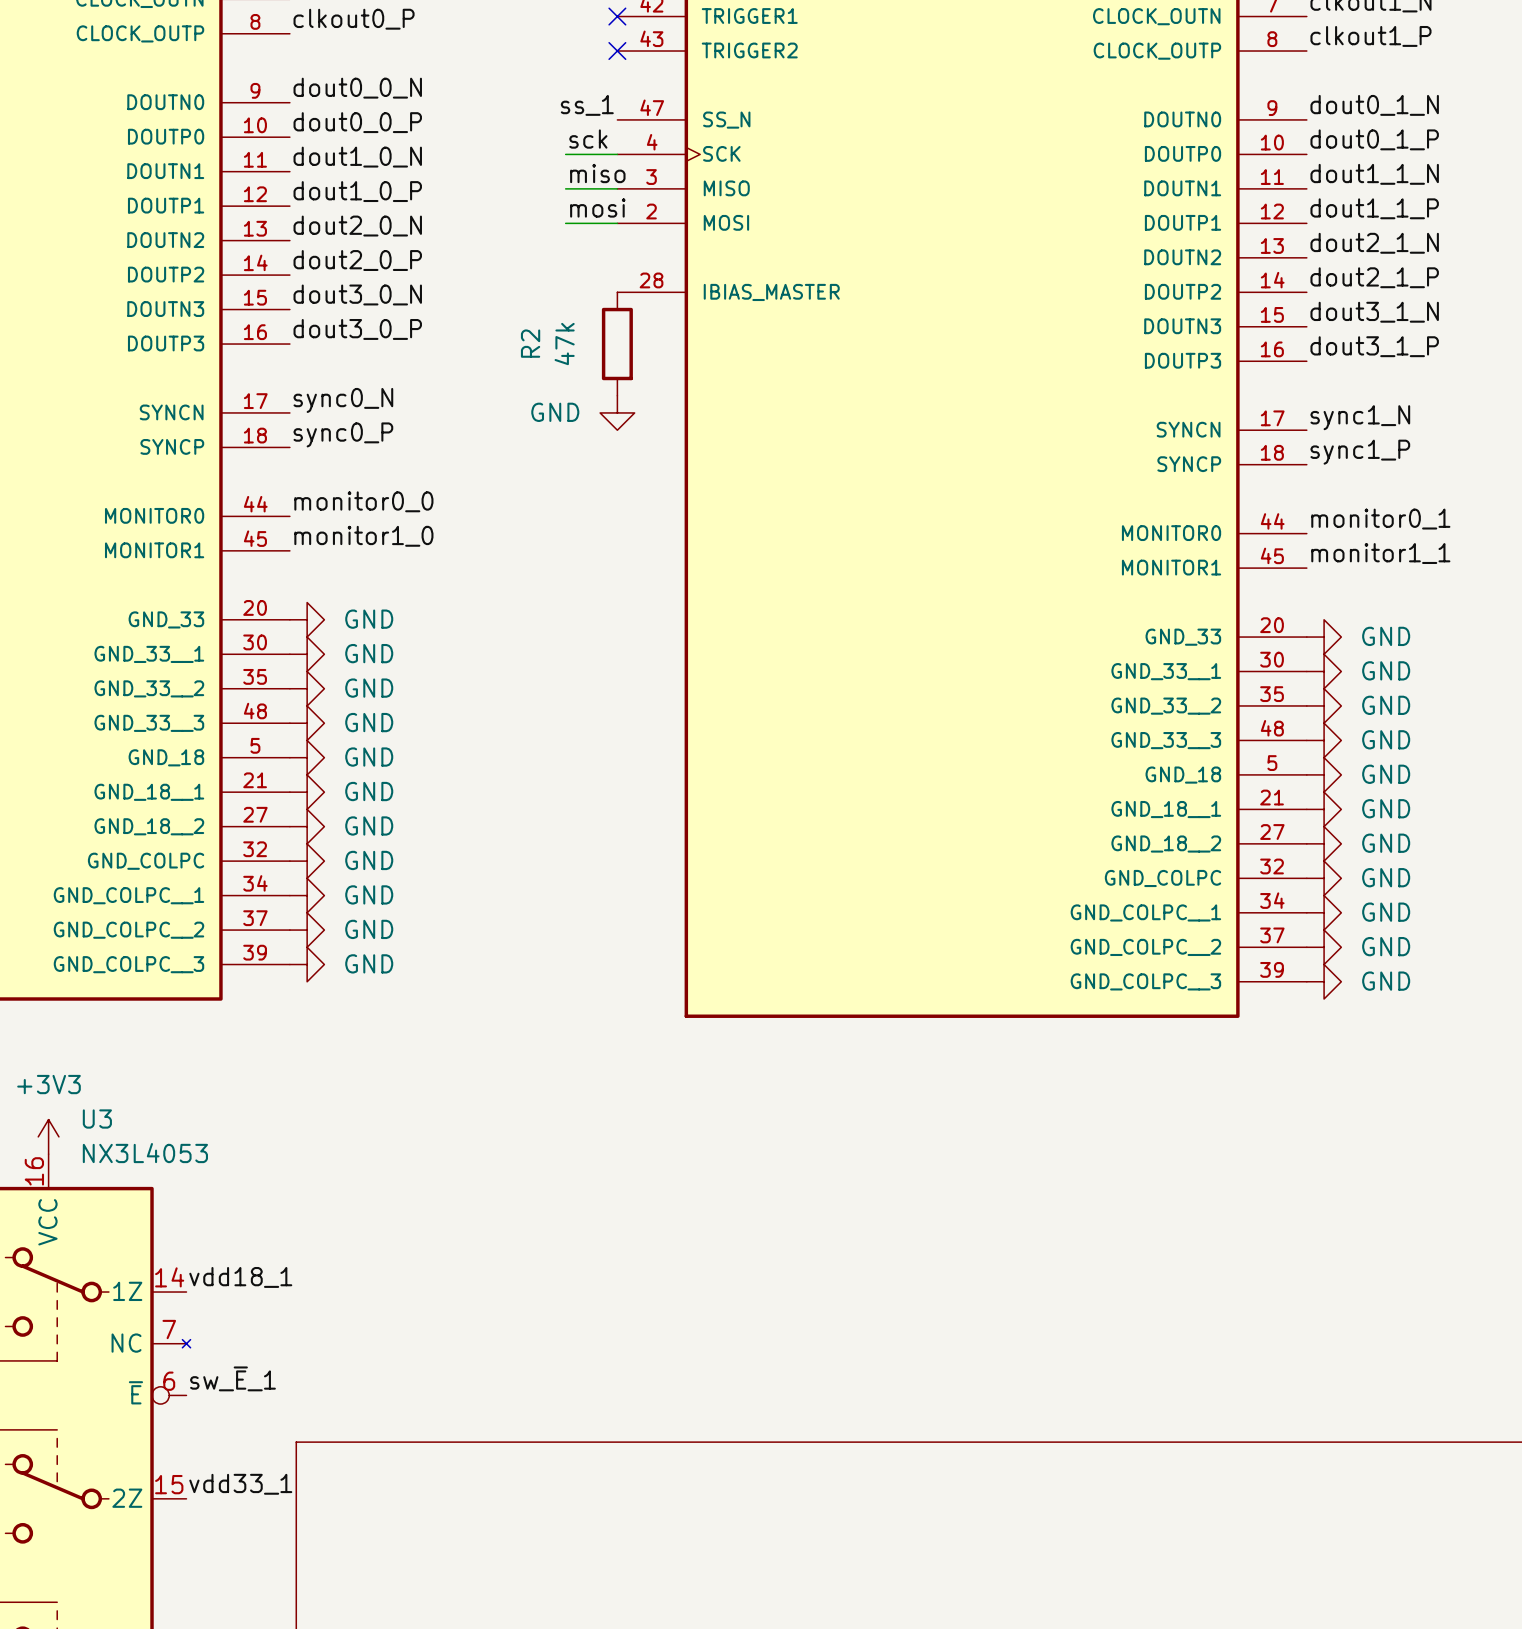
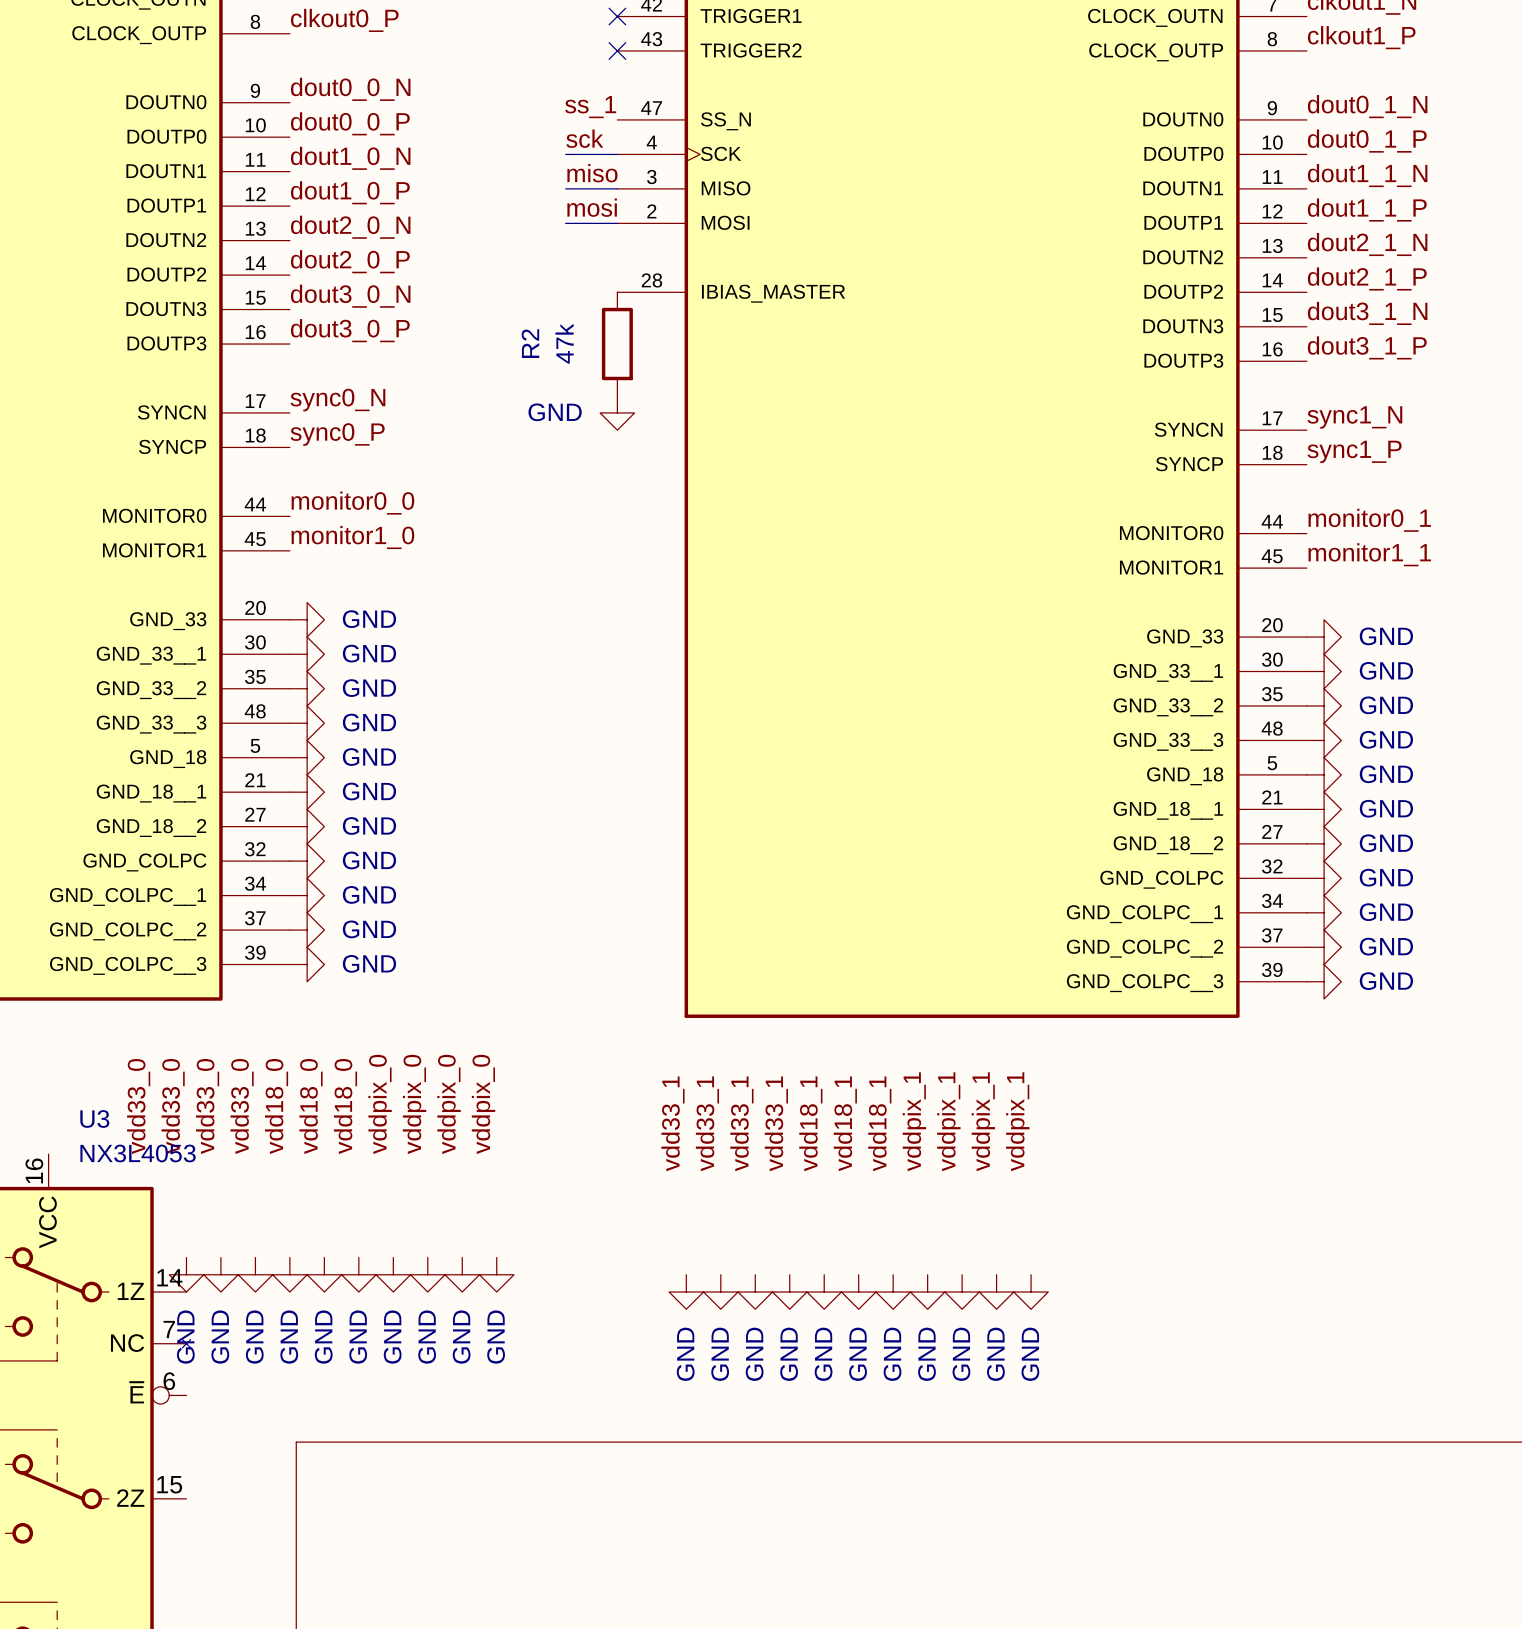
label: none -> vddpix_0 (380, 1104)
label: none -> vddpix_0 (414, 1104)
label: none -> vddpix_0 (449, 1104)
label: none -> vddpix_0 (483, 1104)
label: none -> vdd33_0 (138, 1106)
label: none -> vdd33_0 (173, 1106)
label: none -> vdd33_0 (207, 1106)
label: none -> vdd33_0 (242, 1106)
label: none -> vdd18_0 (276, 1106)
label: none -> vdd18_0 (311, 1106)
label: none -> vdd18_0 (345, 1106)
label: none -> vddpix_1 (914, 1121)
label: none -> vddpix_1 (948, 1121)
label: none -> vddpix_1 (983, 1121)
label: none -> vddpix_1 (1017, 1121)
label: none -> vdd33_1 (672, 1123)
label: none -> vdd33_1 (707, 1123)
label: none -> vdd33_1 (741, 1123)
label: none -> vdd33_1 (776, 1123)
label: none -> vdd18_1 (810, 1123)
label: none -> vdd18_1 (845, 1123)
label: none -> vdd18_1 (879, 1123)
power symbol: +3V3 (48, 1136) -> none
power symbol: none -> GND (186, 1274)
power symbol: none -> GND (220, 1274)
power symbol: none -> GND (255, 1274)
power symbol: none -> GND (289, 1274)
power symbol: none -> GND (324, 1274)
power symbol: none -> GND (358, 1274)
power symbol: none -> GND (393, 1274)
power symbol: none -> GND (427, 1274)
power symbol: none -> GND (462, 1274)
power symbol: none -> GND (496, 1274)
label: vdd18_1 (240, 1277) -> none
power symbol: none -> GND (686, 1292)
power symbol: none -> GND (720, 1292)
power symbol: none -> GND (755, 1292)
power symbol: none -> GND (789, 1292)
power symbol: none -> GND (824, 1292)
power symbol: none -> GND (858, 1292)
power symbol: none -> GND (893, 1292)
power symbol: none -> GND (927, 1292)
power symbol: none -> GND (962, 1292)
power symbol: none -> GND (996, 1292)
power symbol: none -> GND (1031, 1292)
label: sw_~{E}_1 (232, 1378) -> none
label: vdd33_1 (240, 1484) -> none

